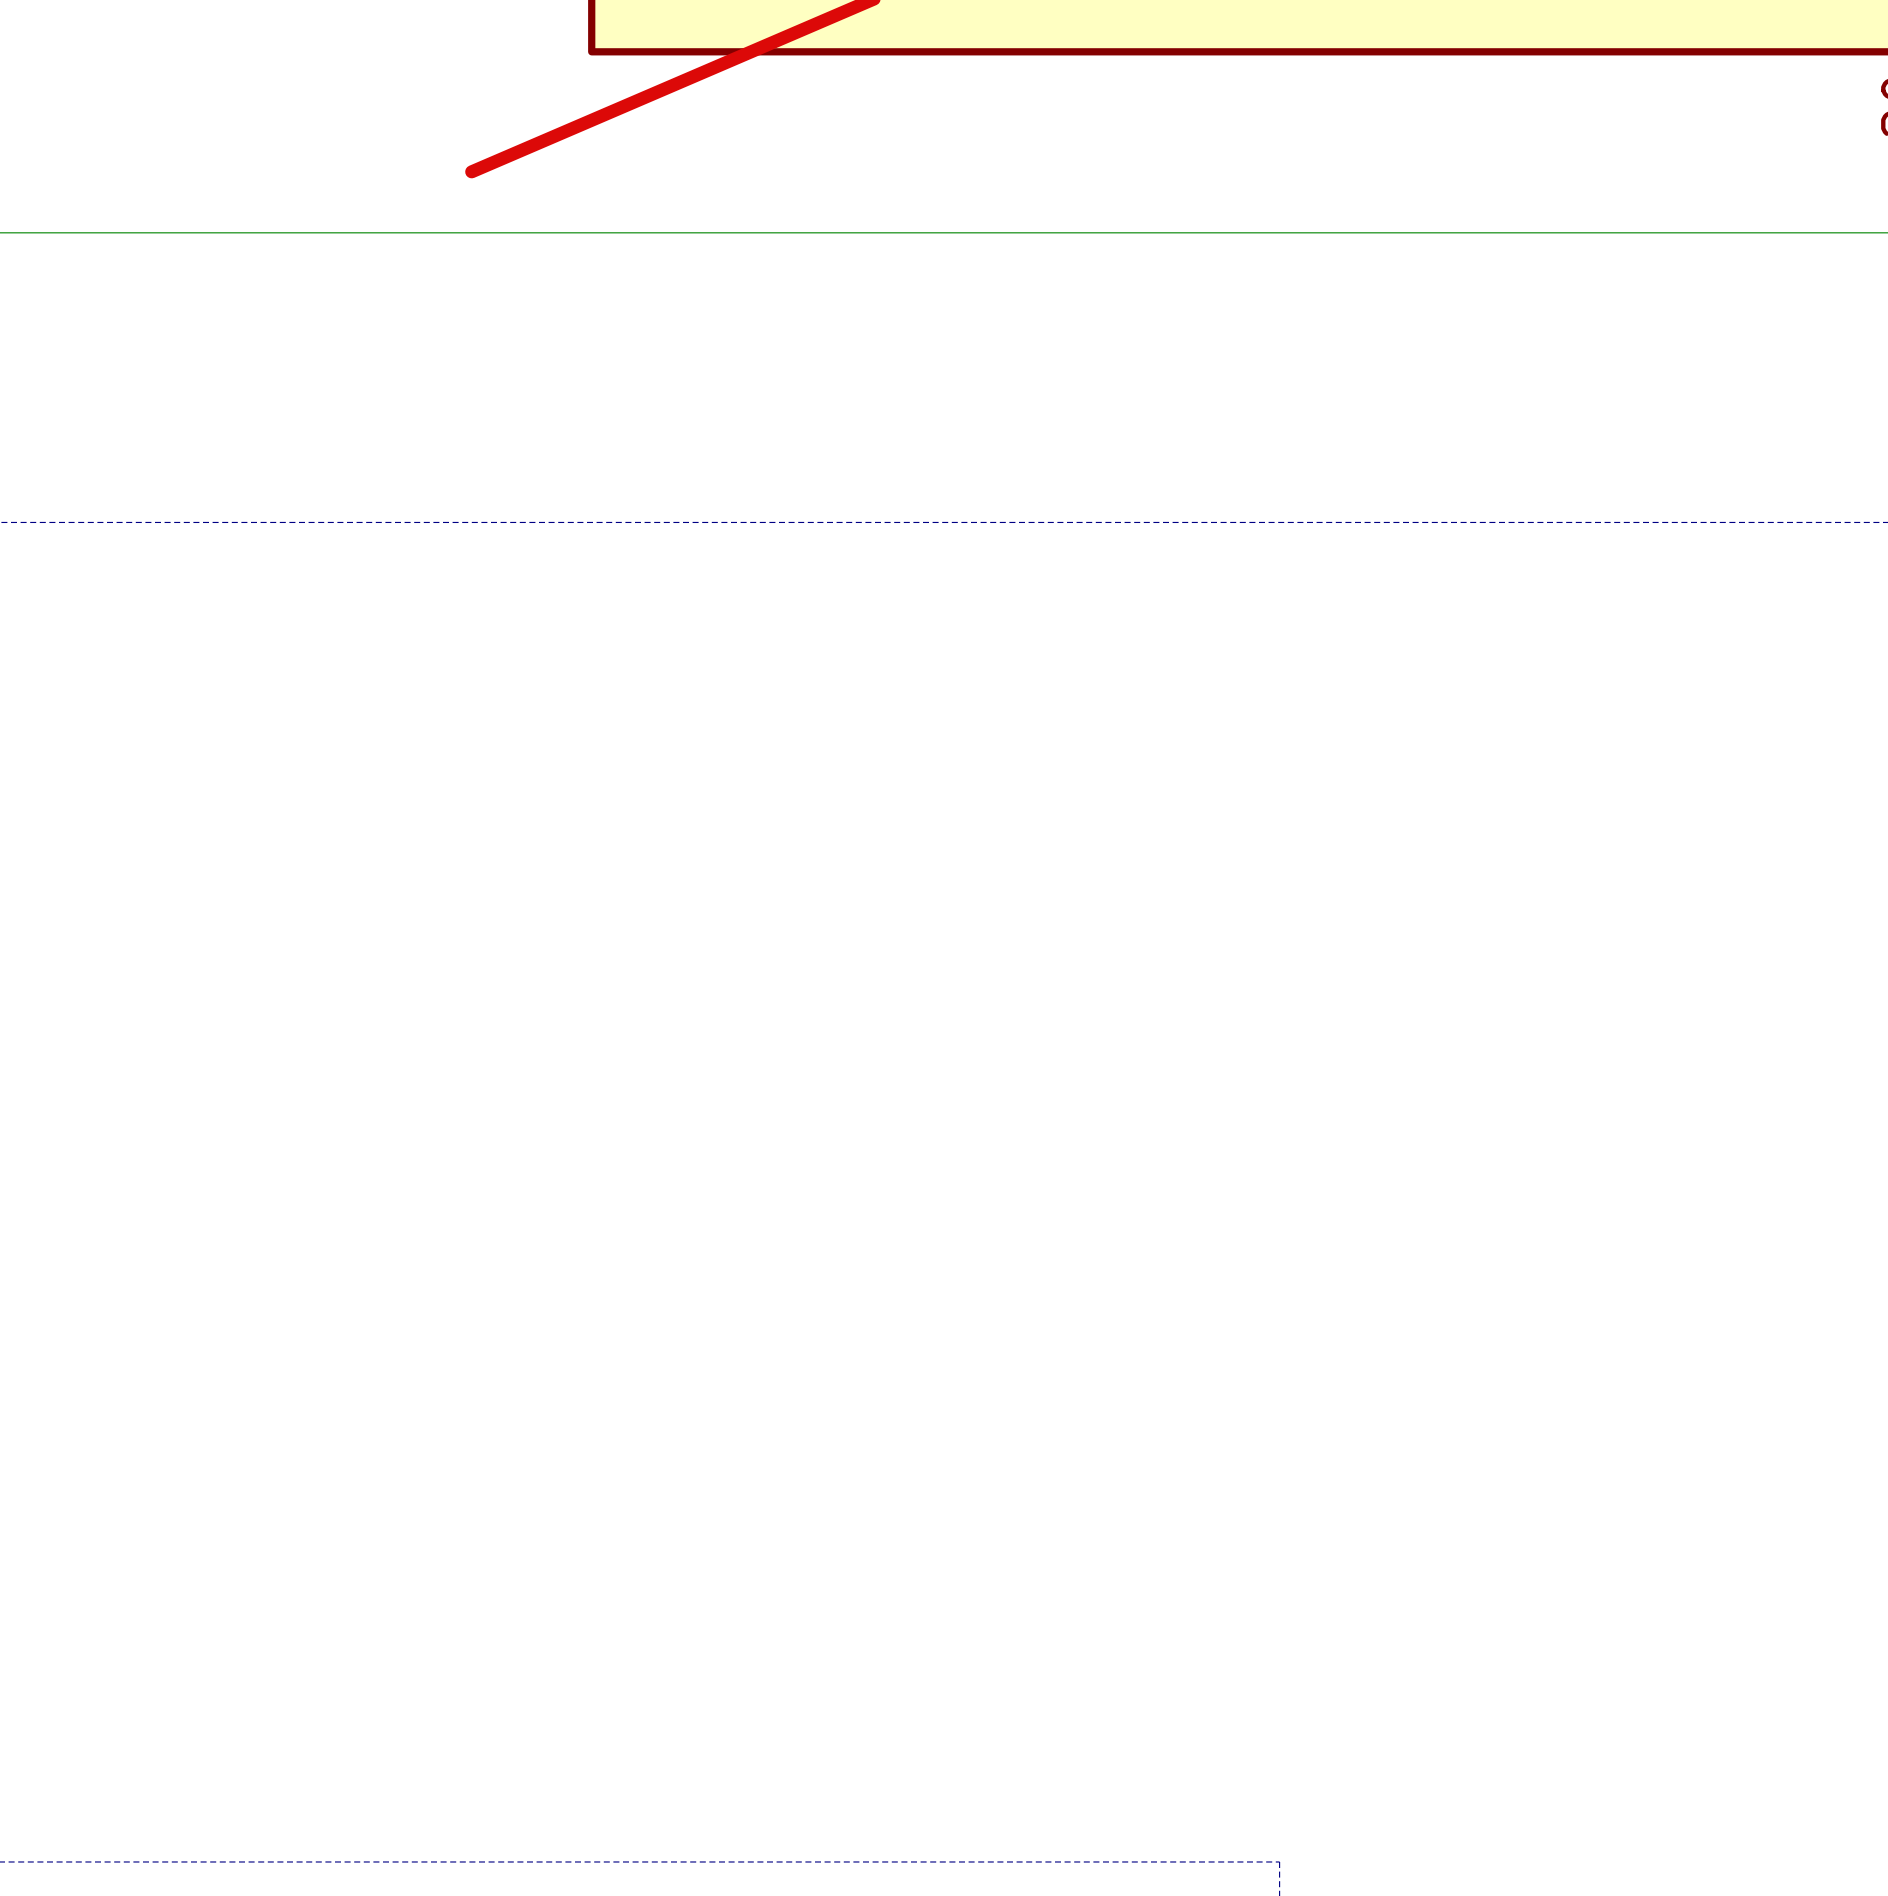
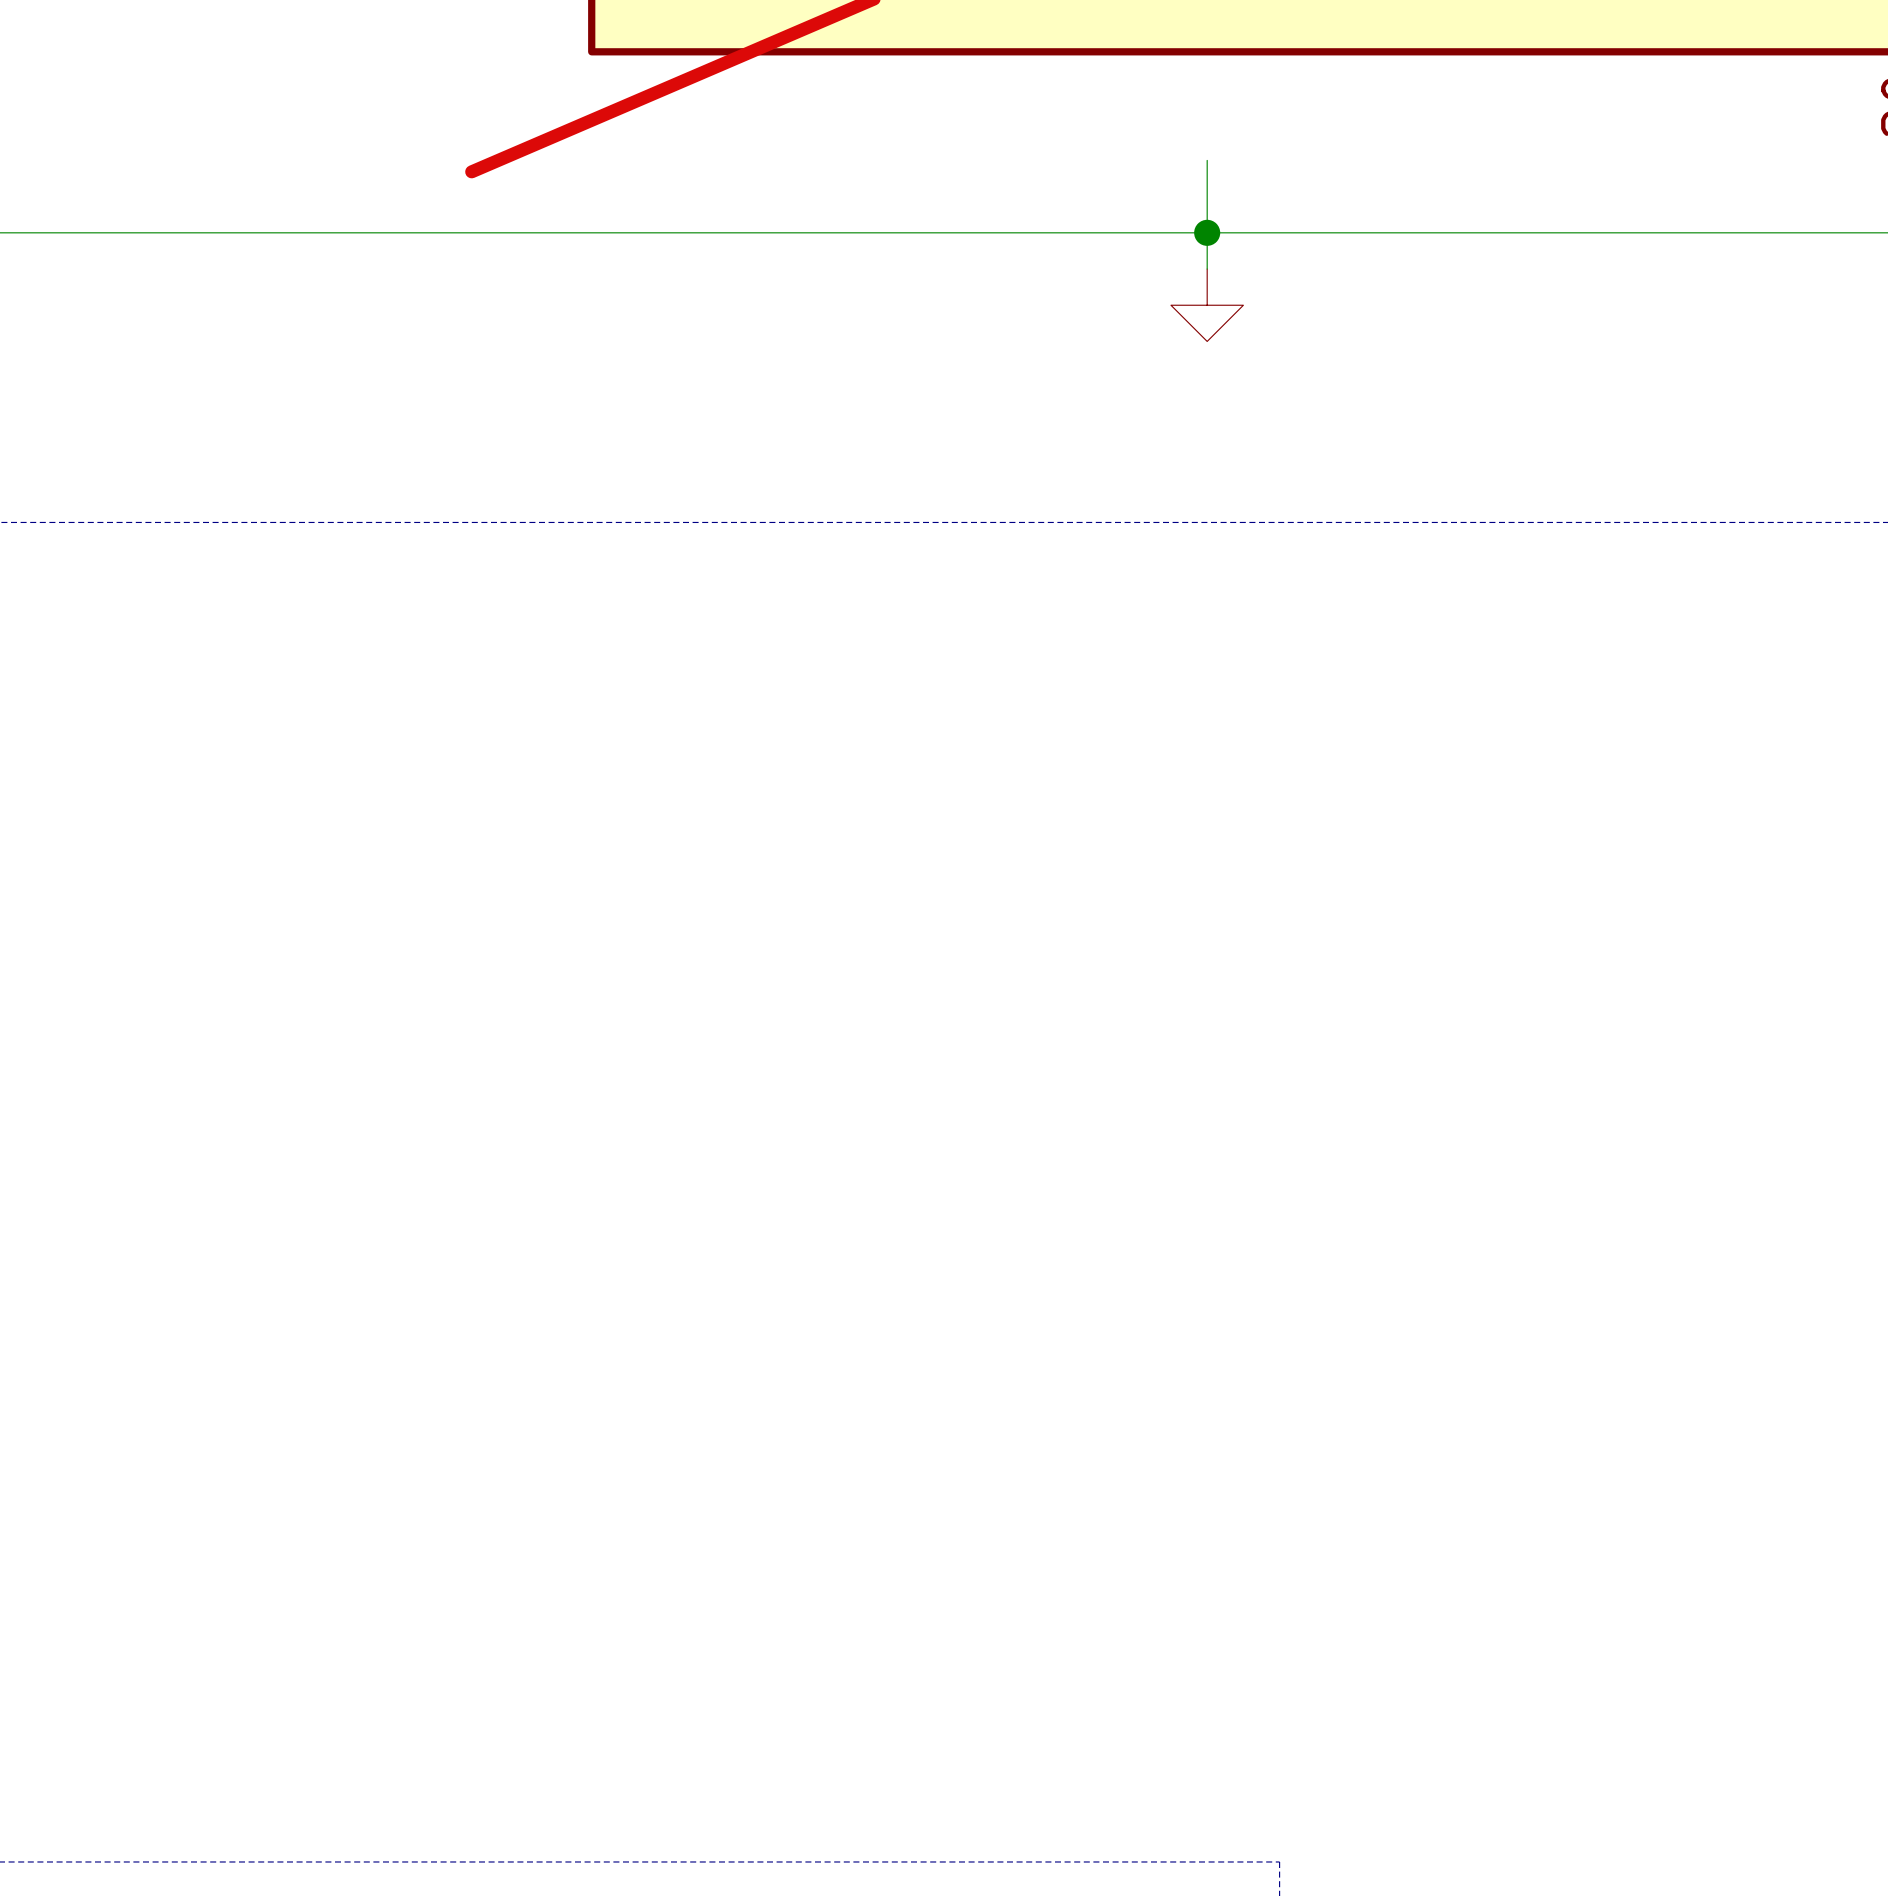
wire: none -> (1207, 160) (1207, 269)
junction: none -> (1207, 232)
power symbol: none -> (1207, 305)

